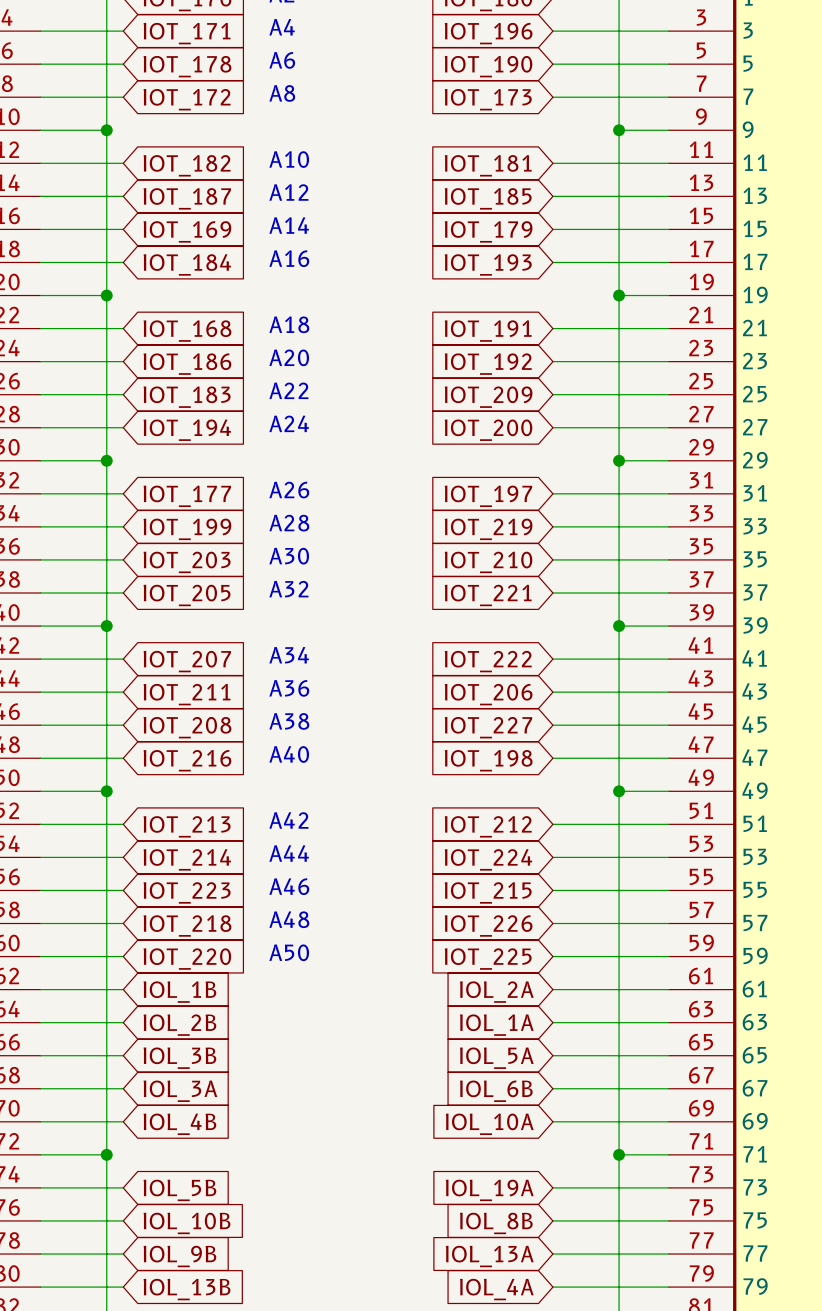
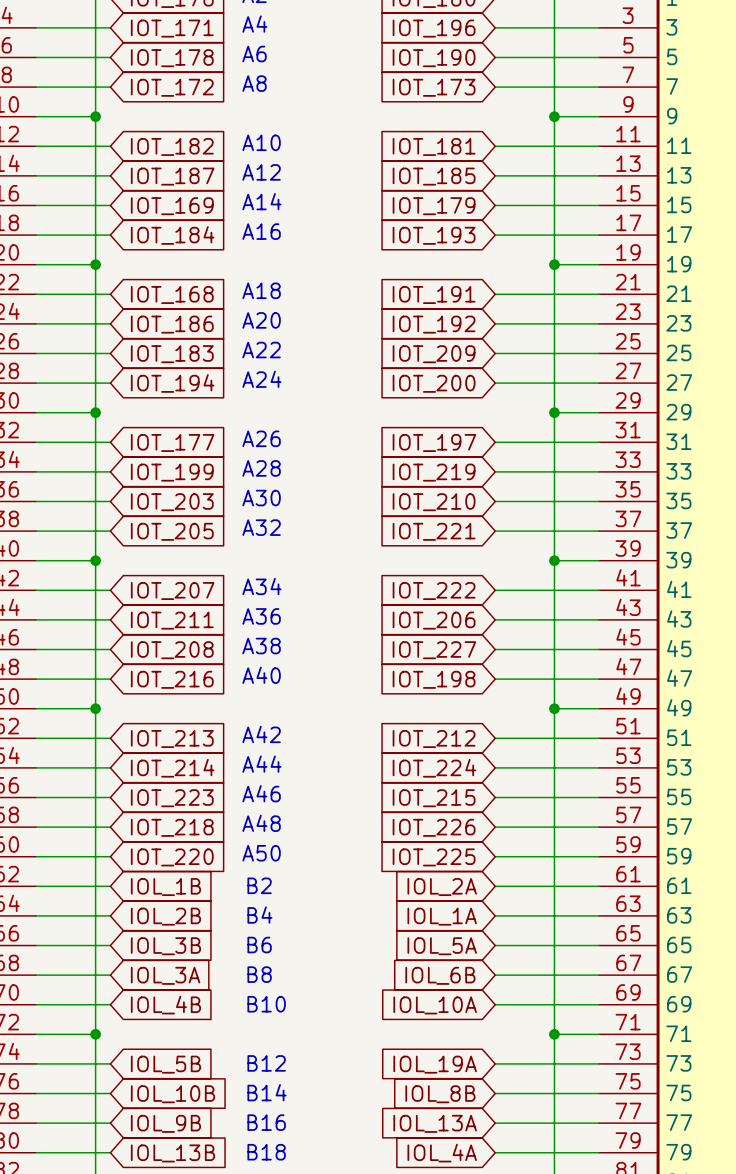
text: none -> B2 (259, 885)
text: none -> B4 (259, 915)
text: none -> B6 (259, 945)
text: none -> B8 (259, 974)
text: none -> B10 (266, 1004)
text: none -> B12 (266, 1063)
text: none -> B14 (266, 1092)
text: none -> B16 (266, 1122)
text: none -> B18 (266, 1152)

